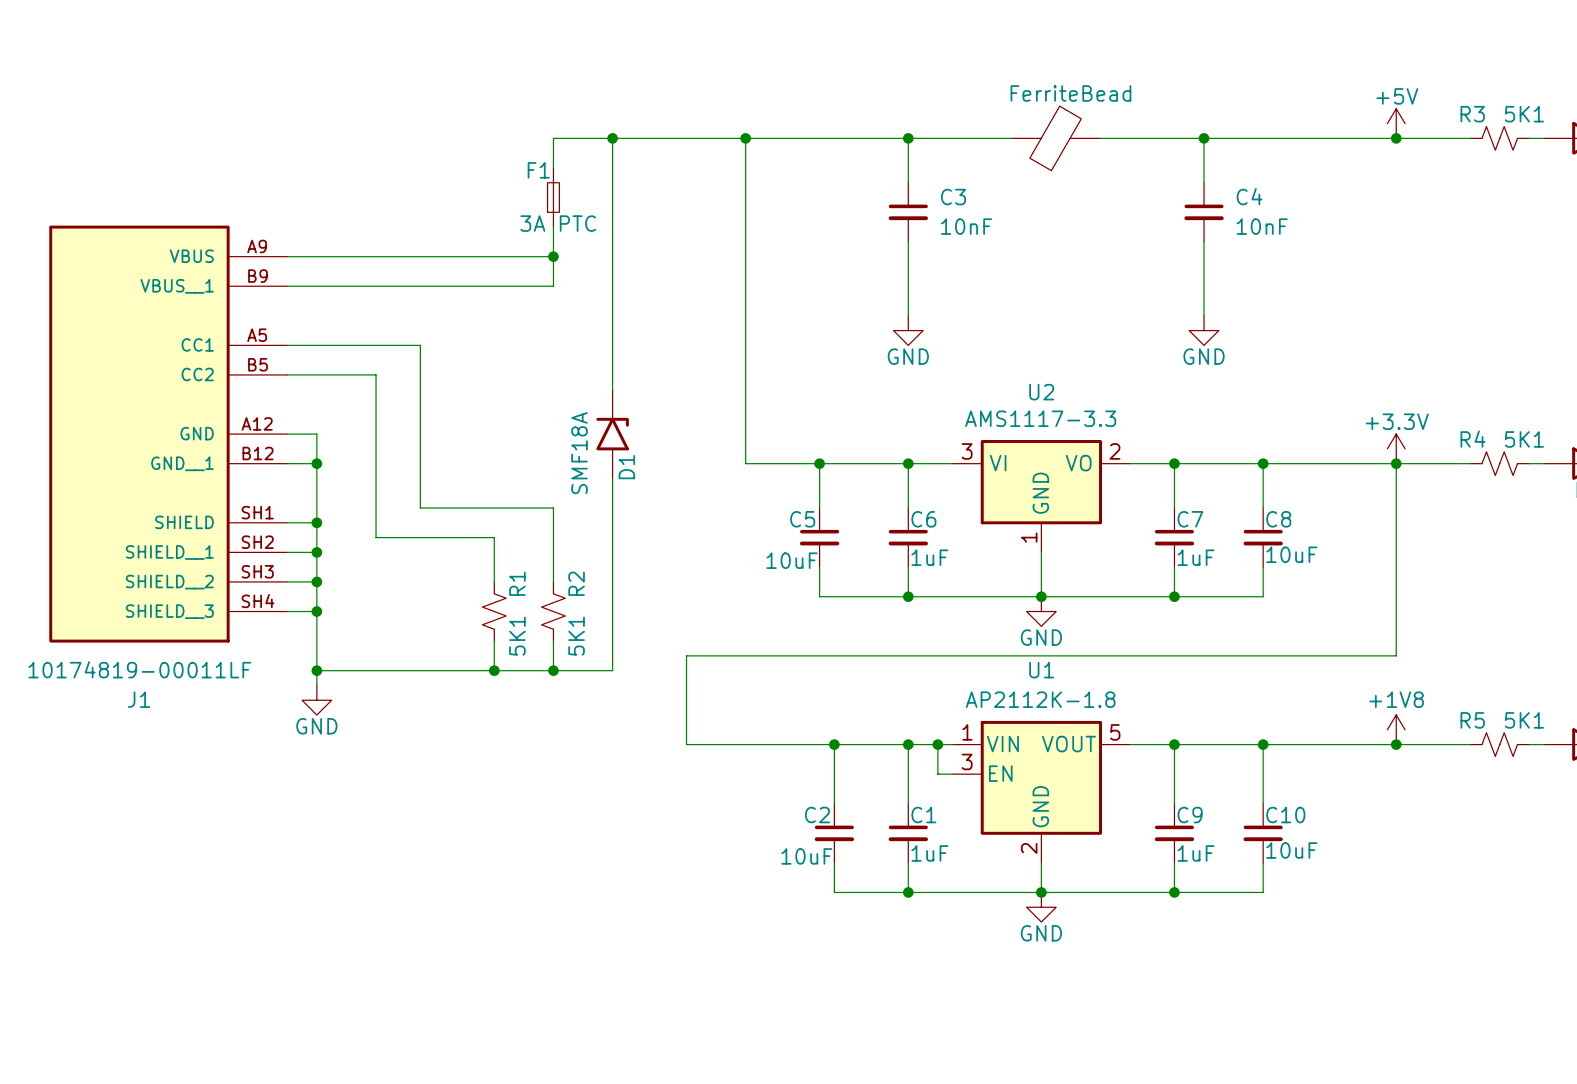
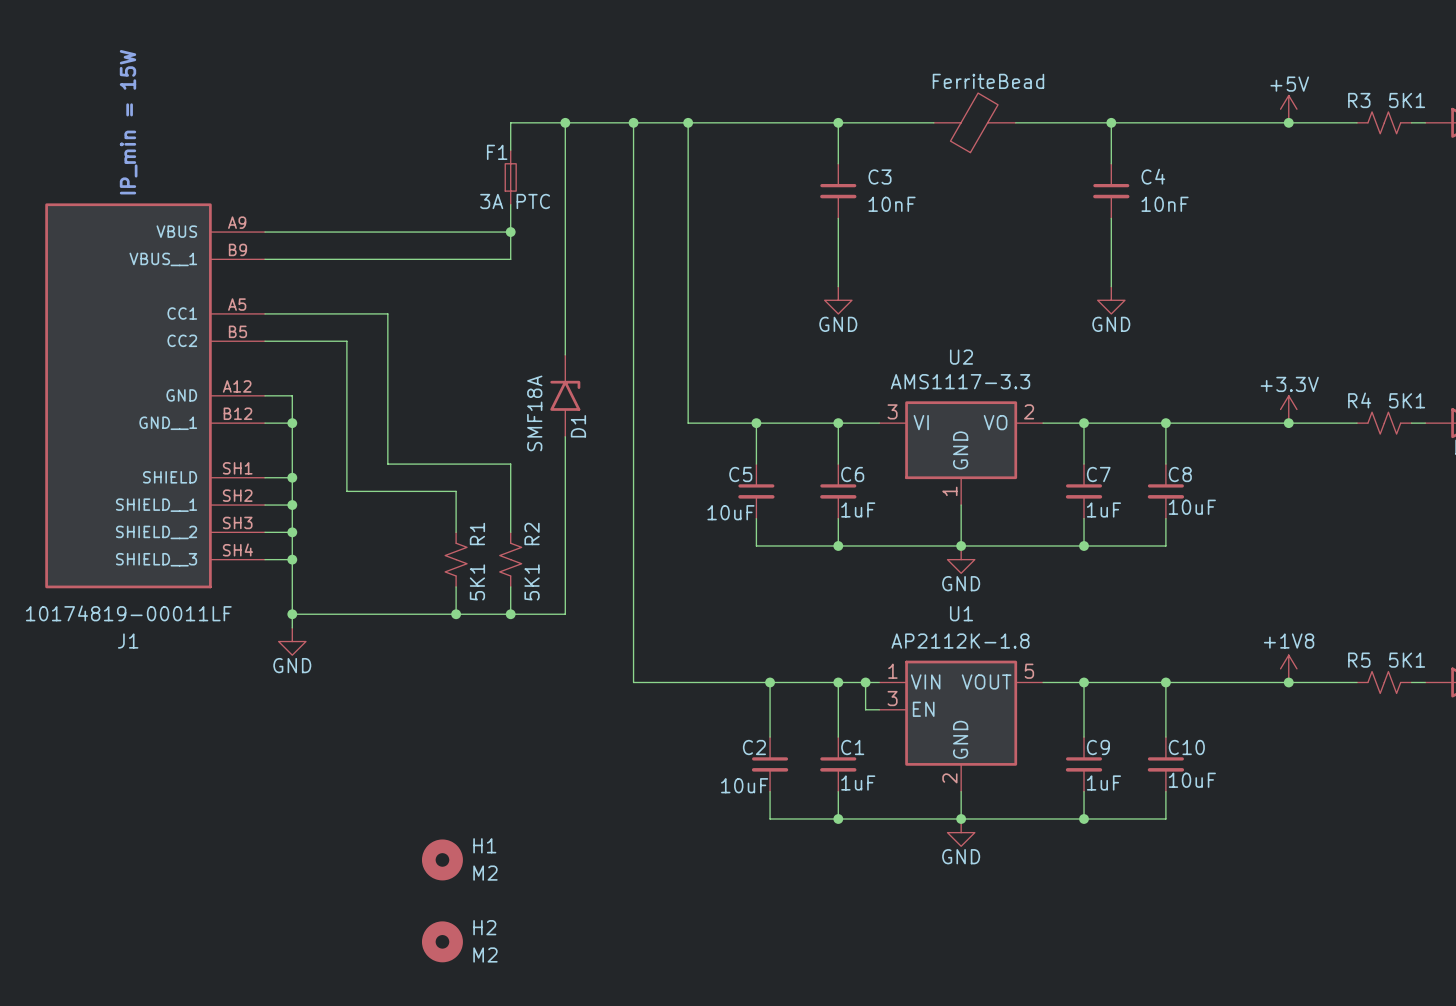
text: none -> IP_min = 15W (128, 122)
junction: none -> (633, 122)
wire: (1396, 463) (1396, 655) (686, 655) -> (633, 122) (633, 600)
H1: none -> M2 (442, 859)
H2: none -> M2 (442, 941)

